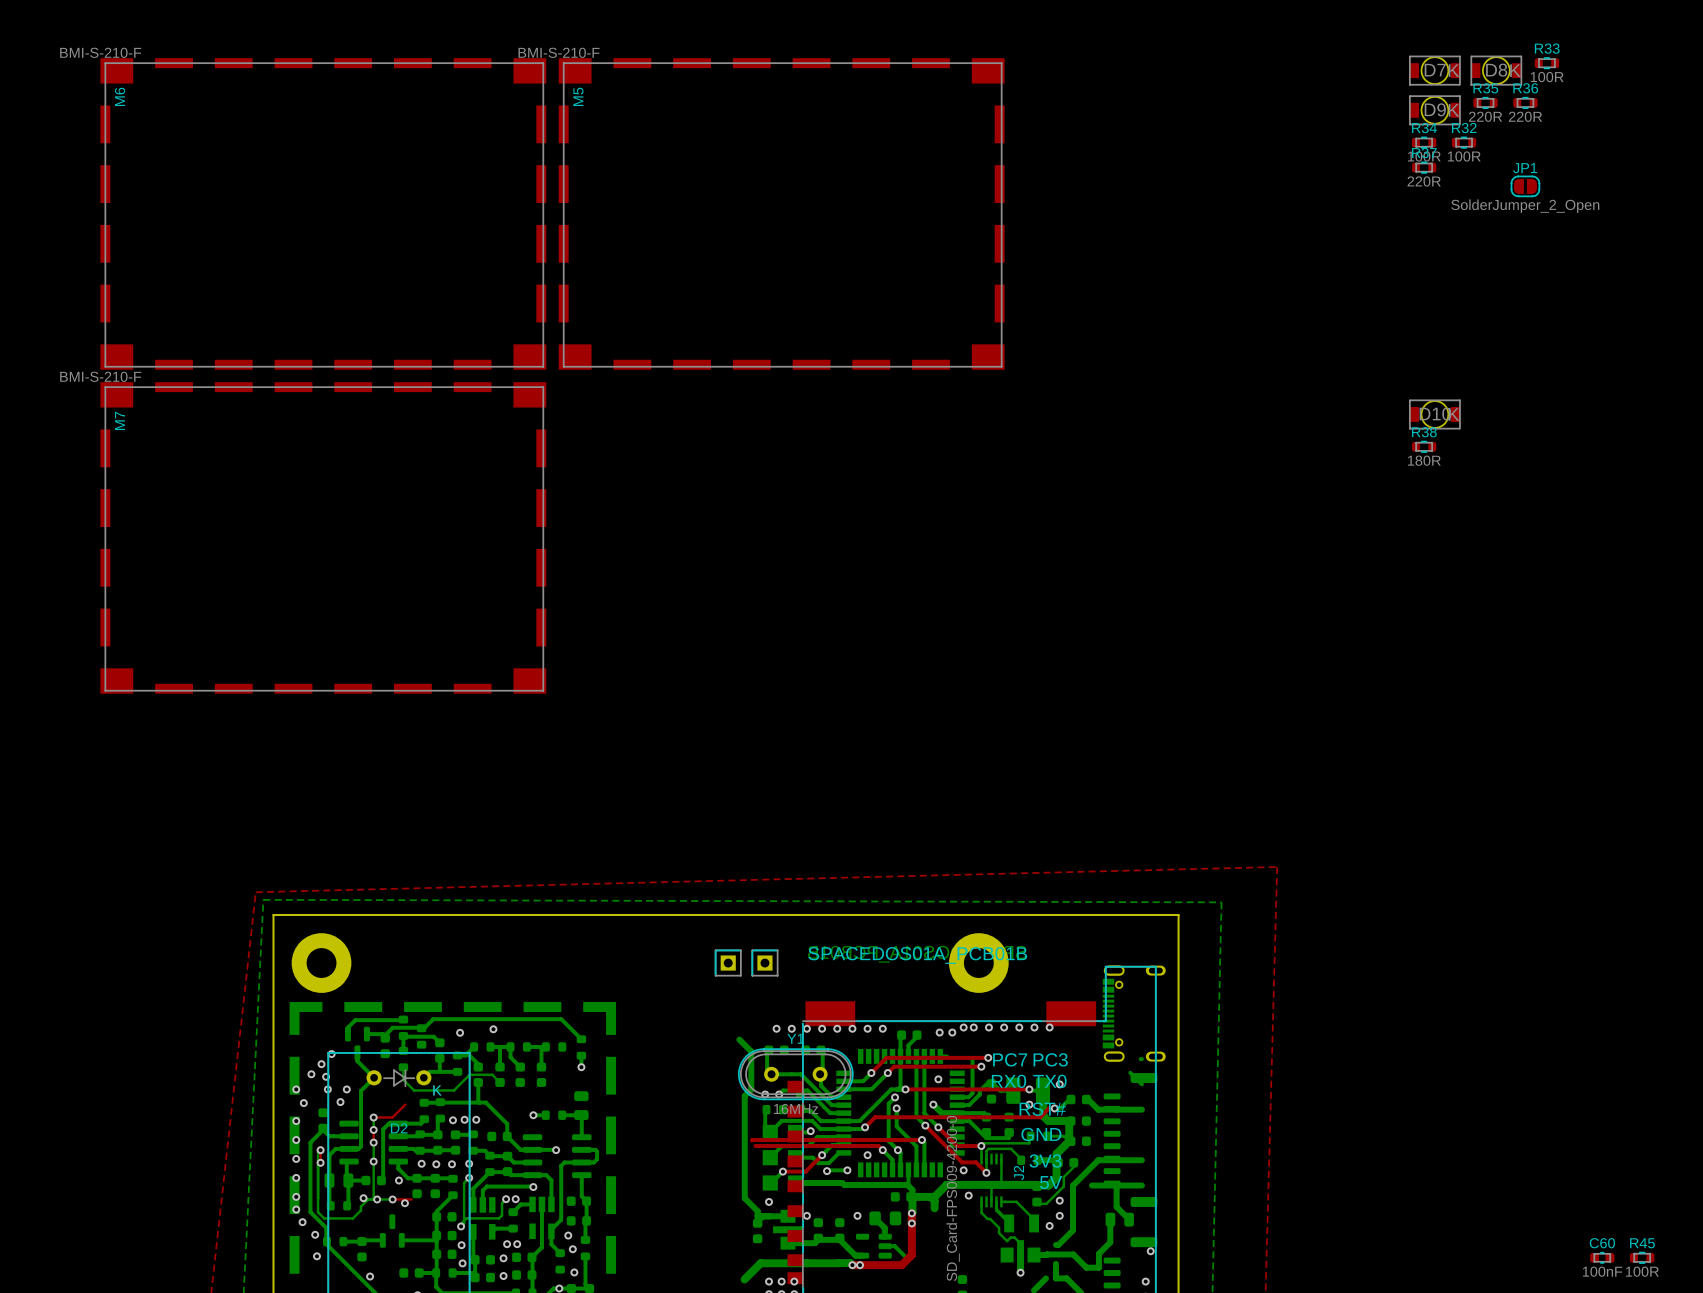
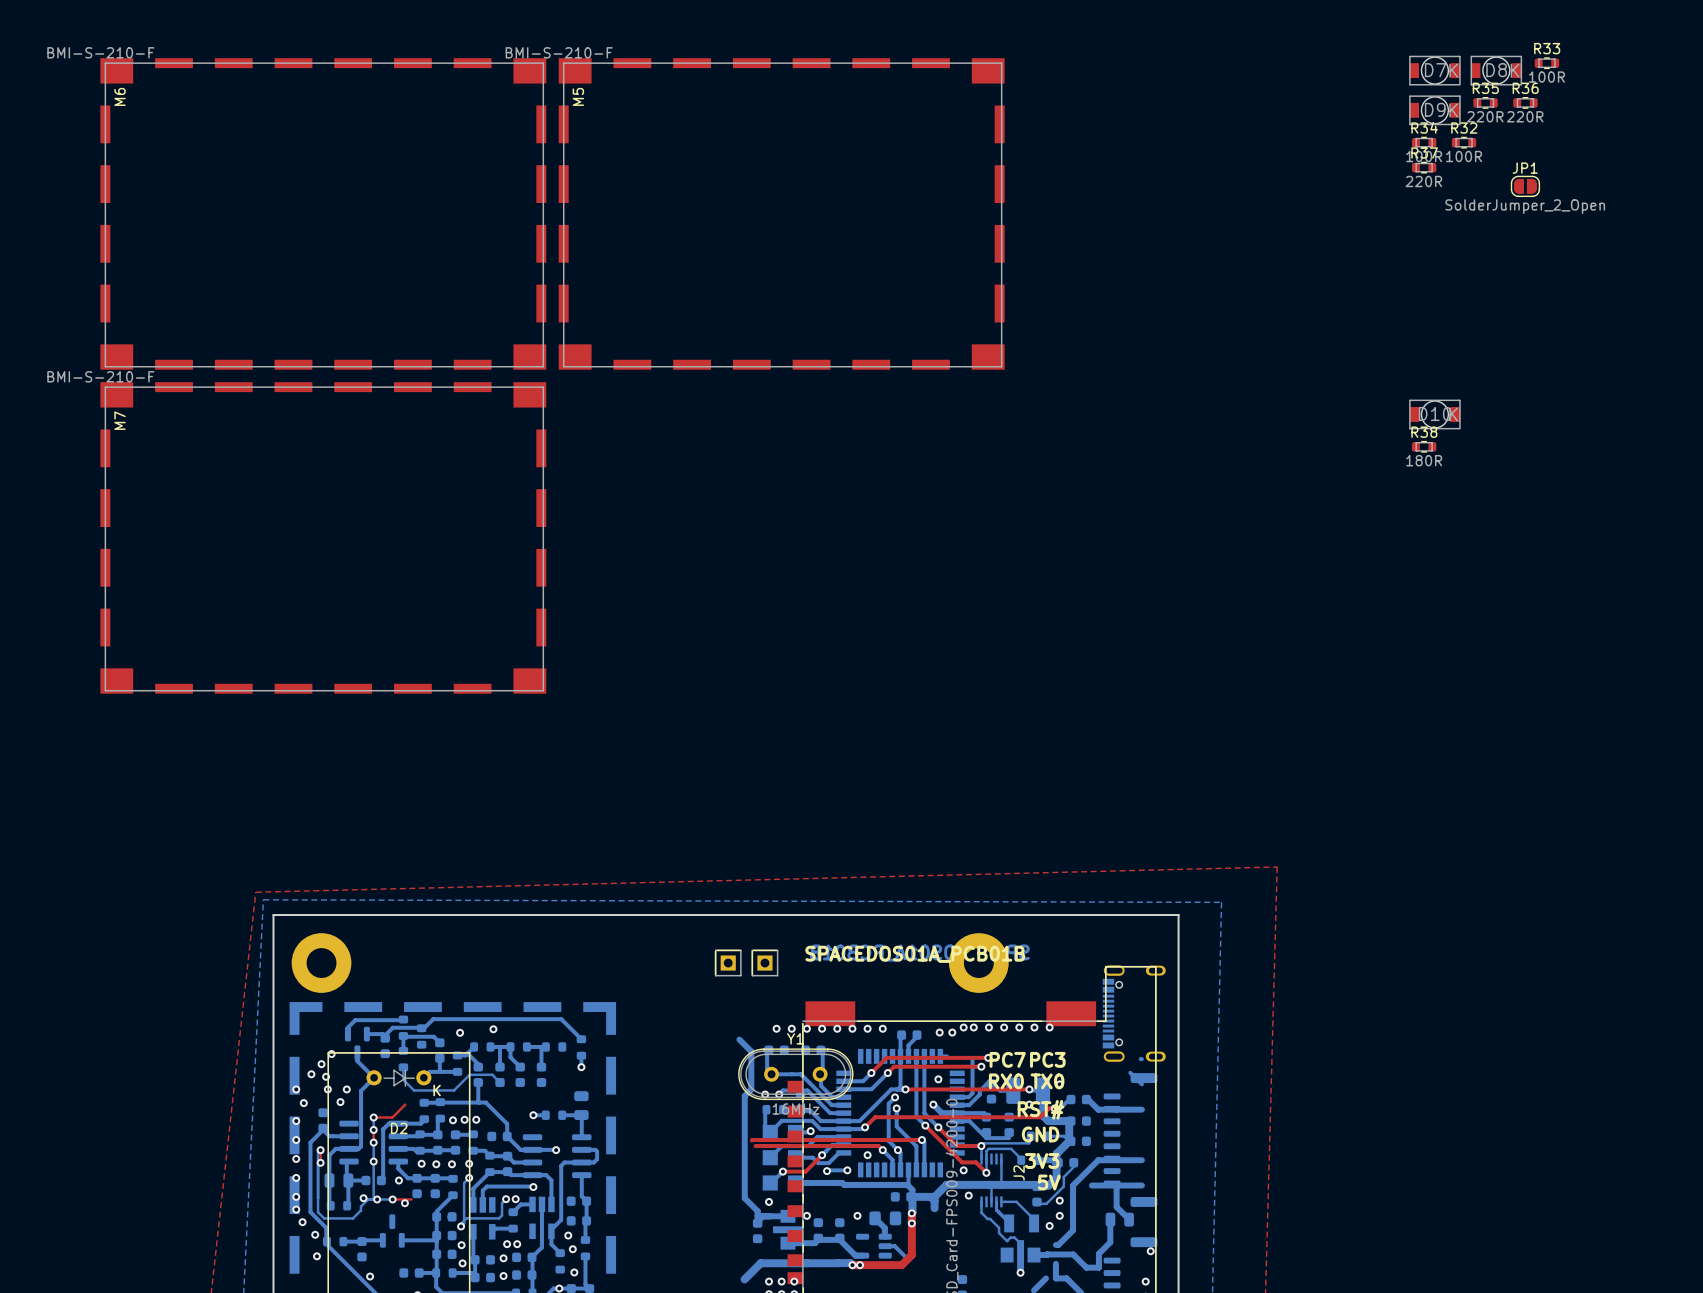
C60: 100nF (1602, 1257) -> none
R45: 100R (1642, 1257) -> none

